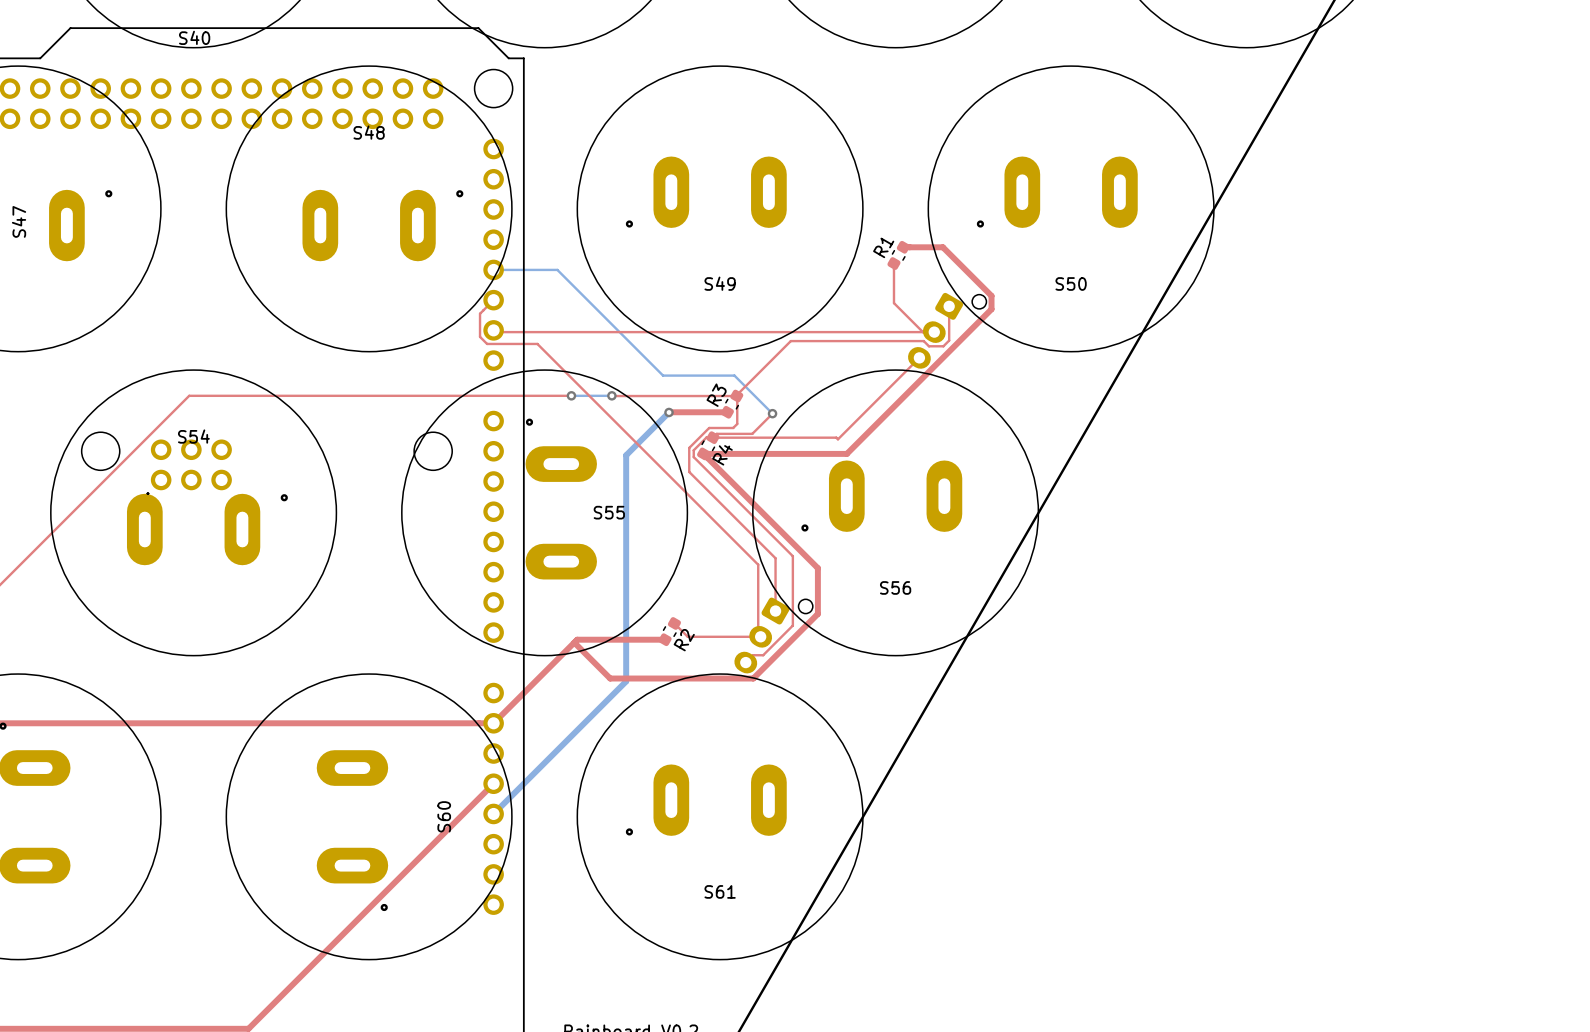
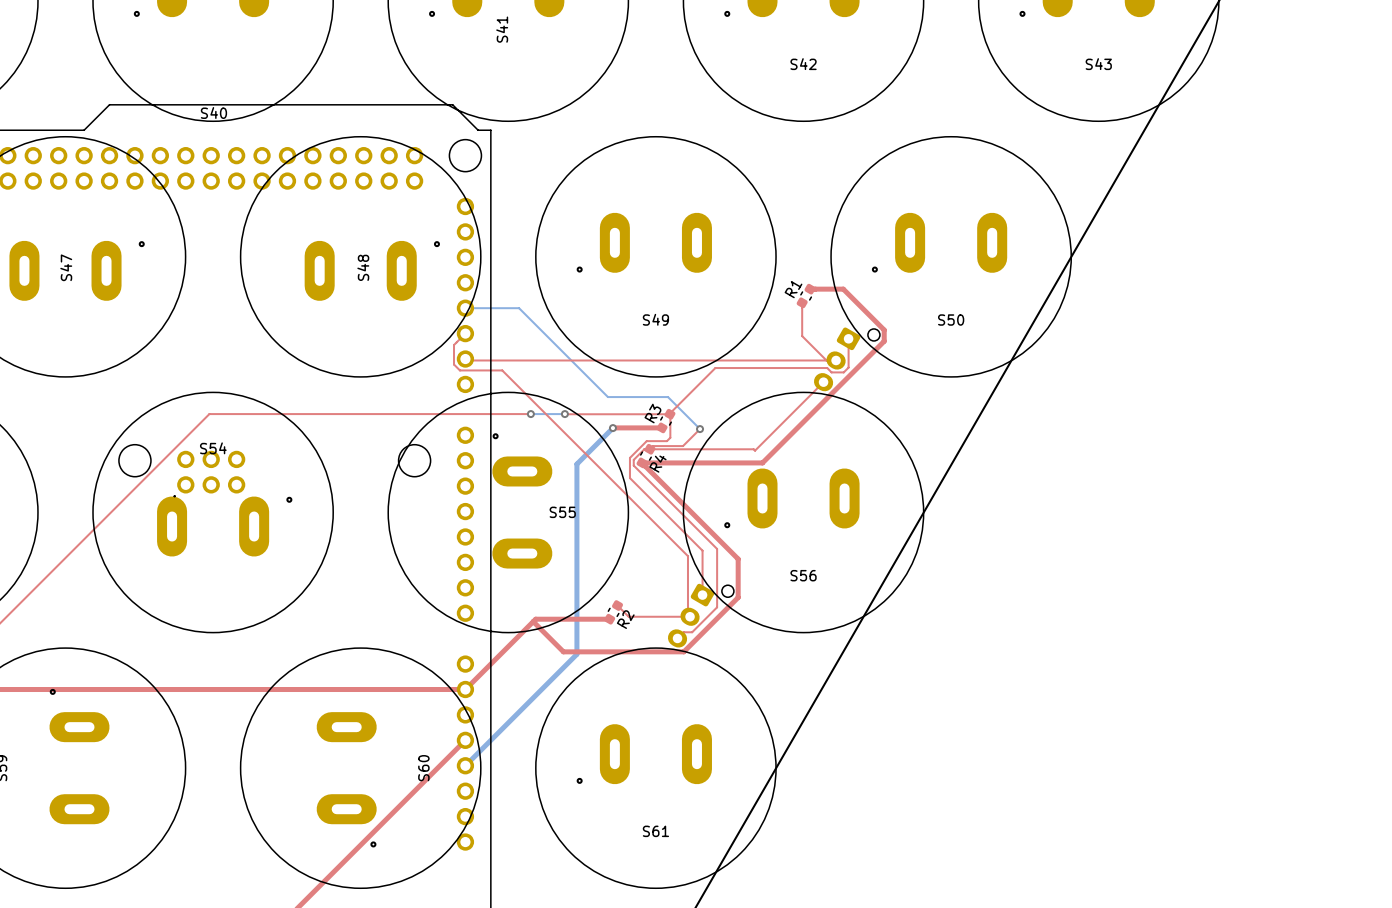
S48 name rotation: 0° (369, 132) -> 90° counterclockwise (363, 267)
S48 name position: S48 (369, 132) -> S48 (363, 267)

